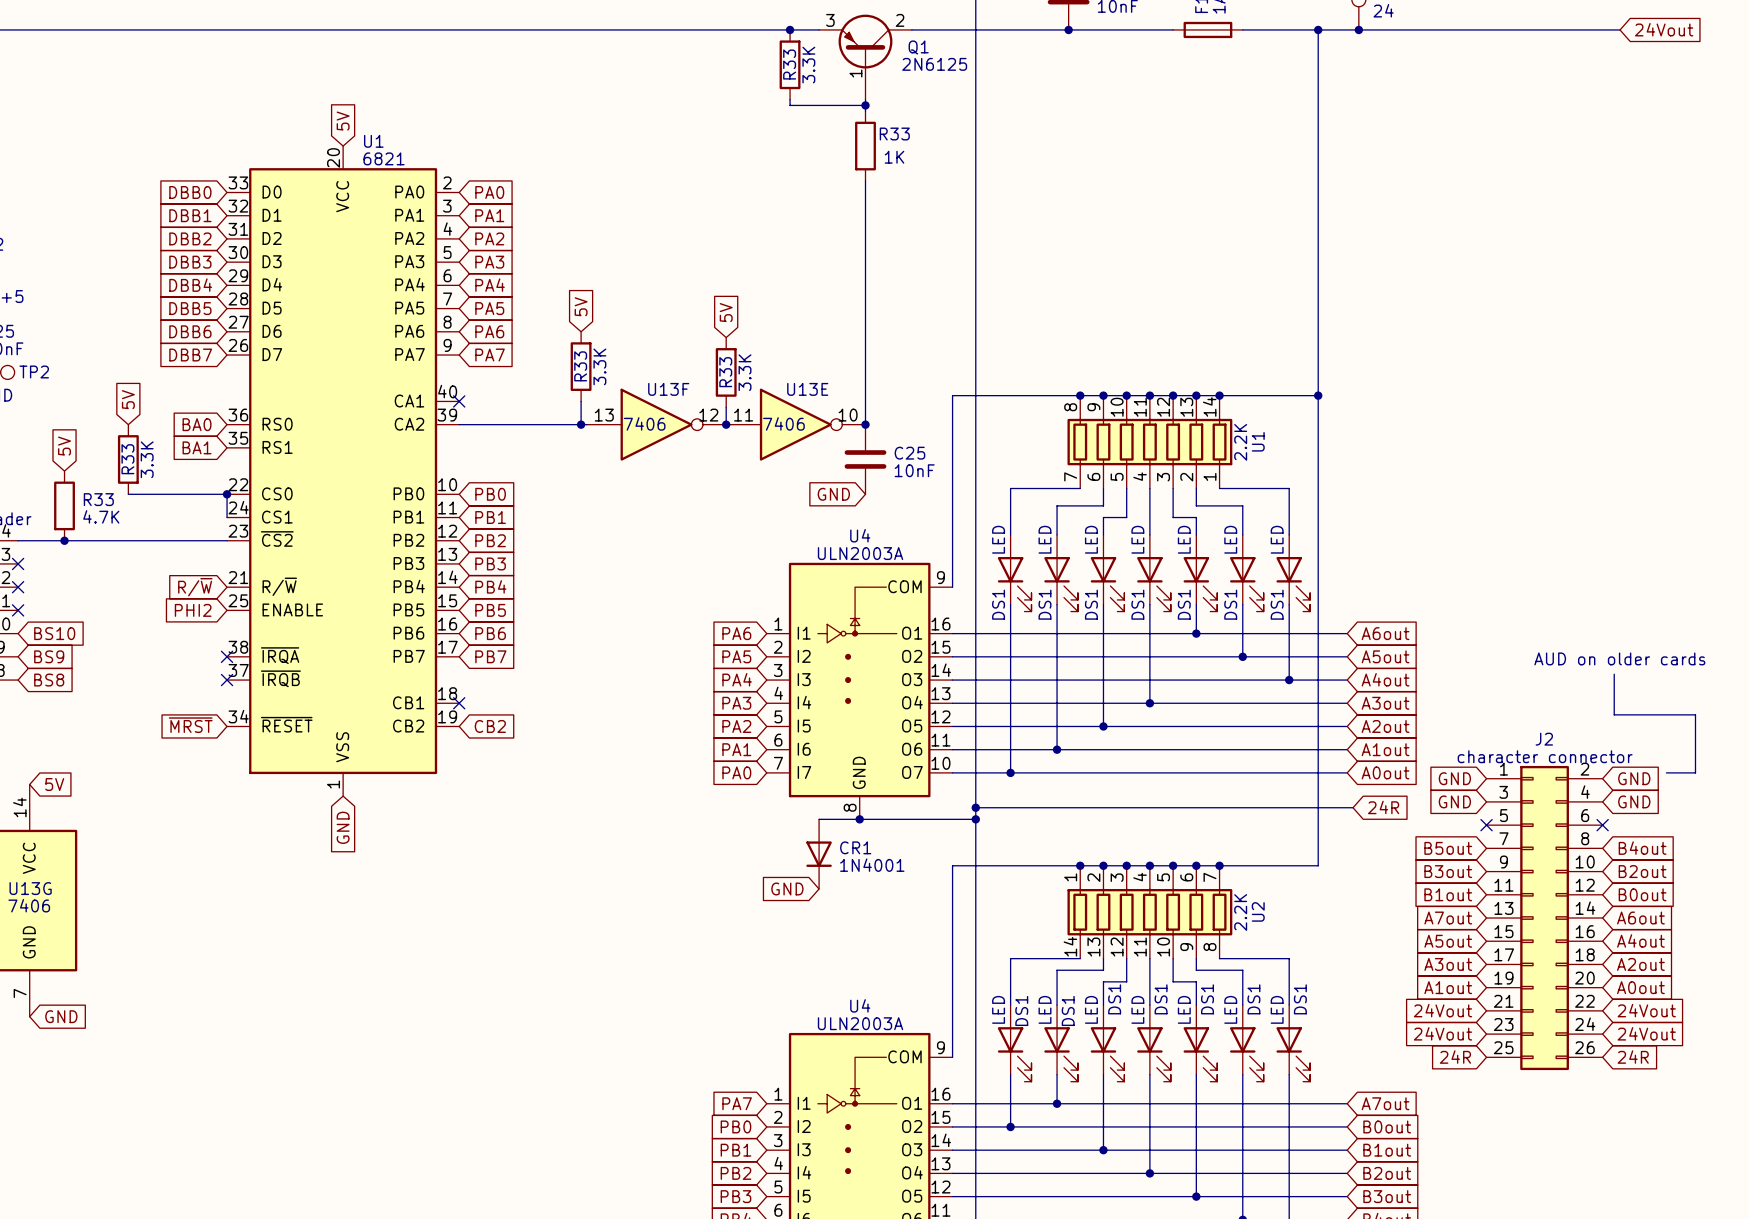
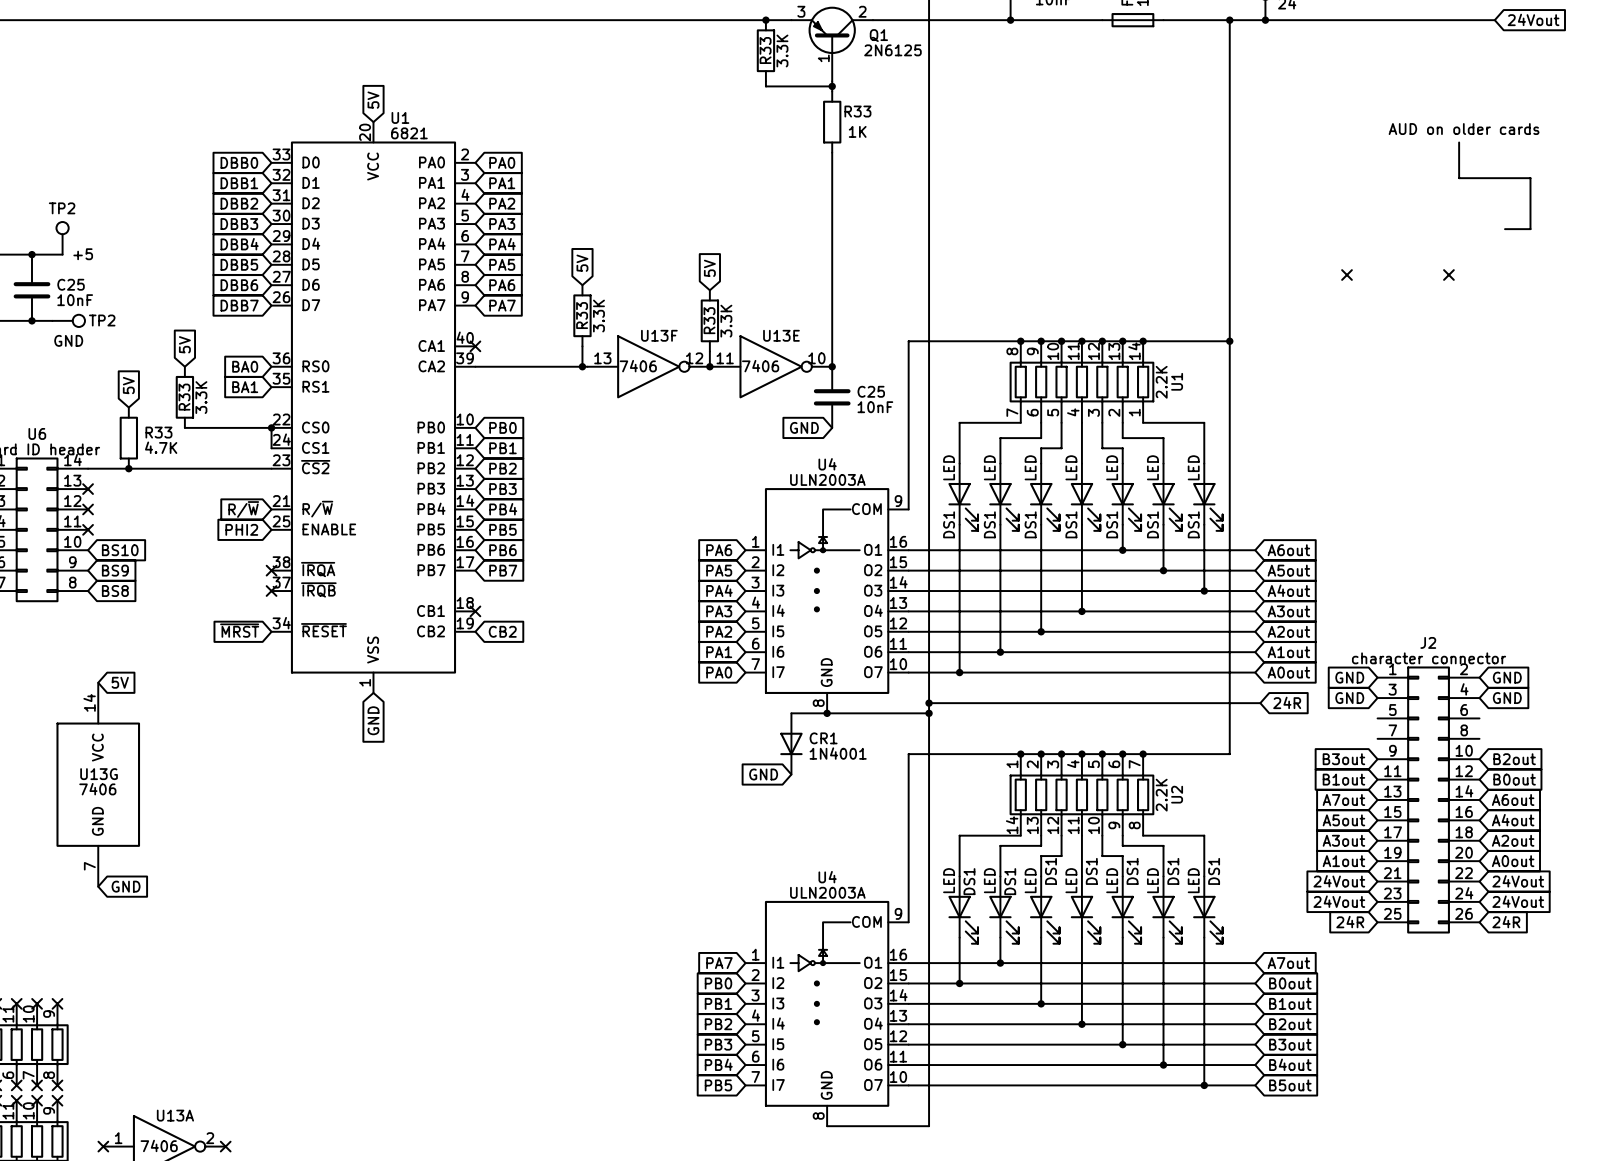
text: none -> AUD on older cards (1464, 129)
line: none -> (1459, 142) (1459, 178) (1530, 178) (1530, 229) (1505, 229)
no-connect mark: none -> (1346, 275)
no-connect mark: none -> (1448, 275)
text: AUD on older cards (1619, 658) -> none
line: (1614, 674) (1614, 714) (1695, 714) (1695, 772) (1666, 772) -> none
no-connect mark: (1486, 825) -> none
no-connect mark: (1602, 825) -> none
global label: B5out (1448, 848) -> none
global label: B4out (1642, 848) -> none

